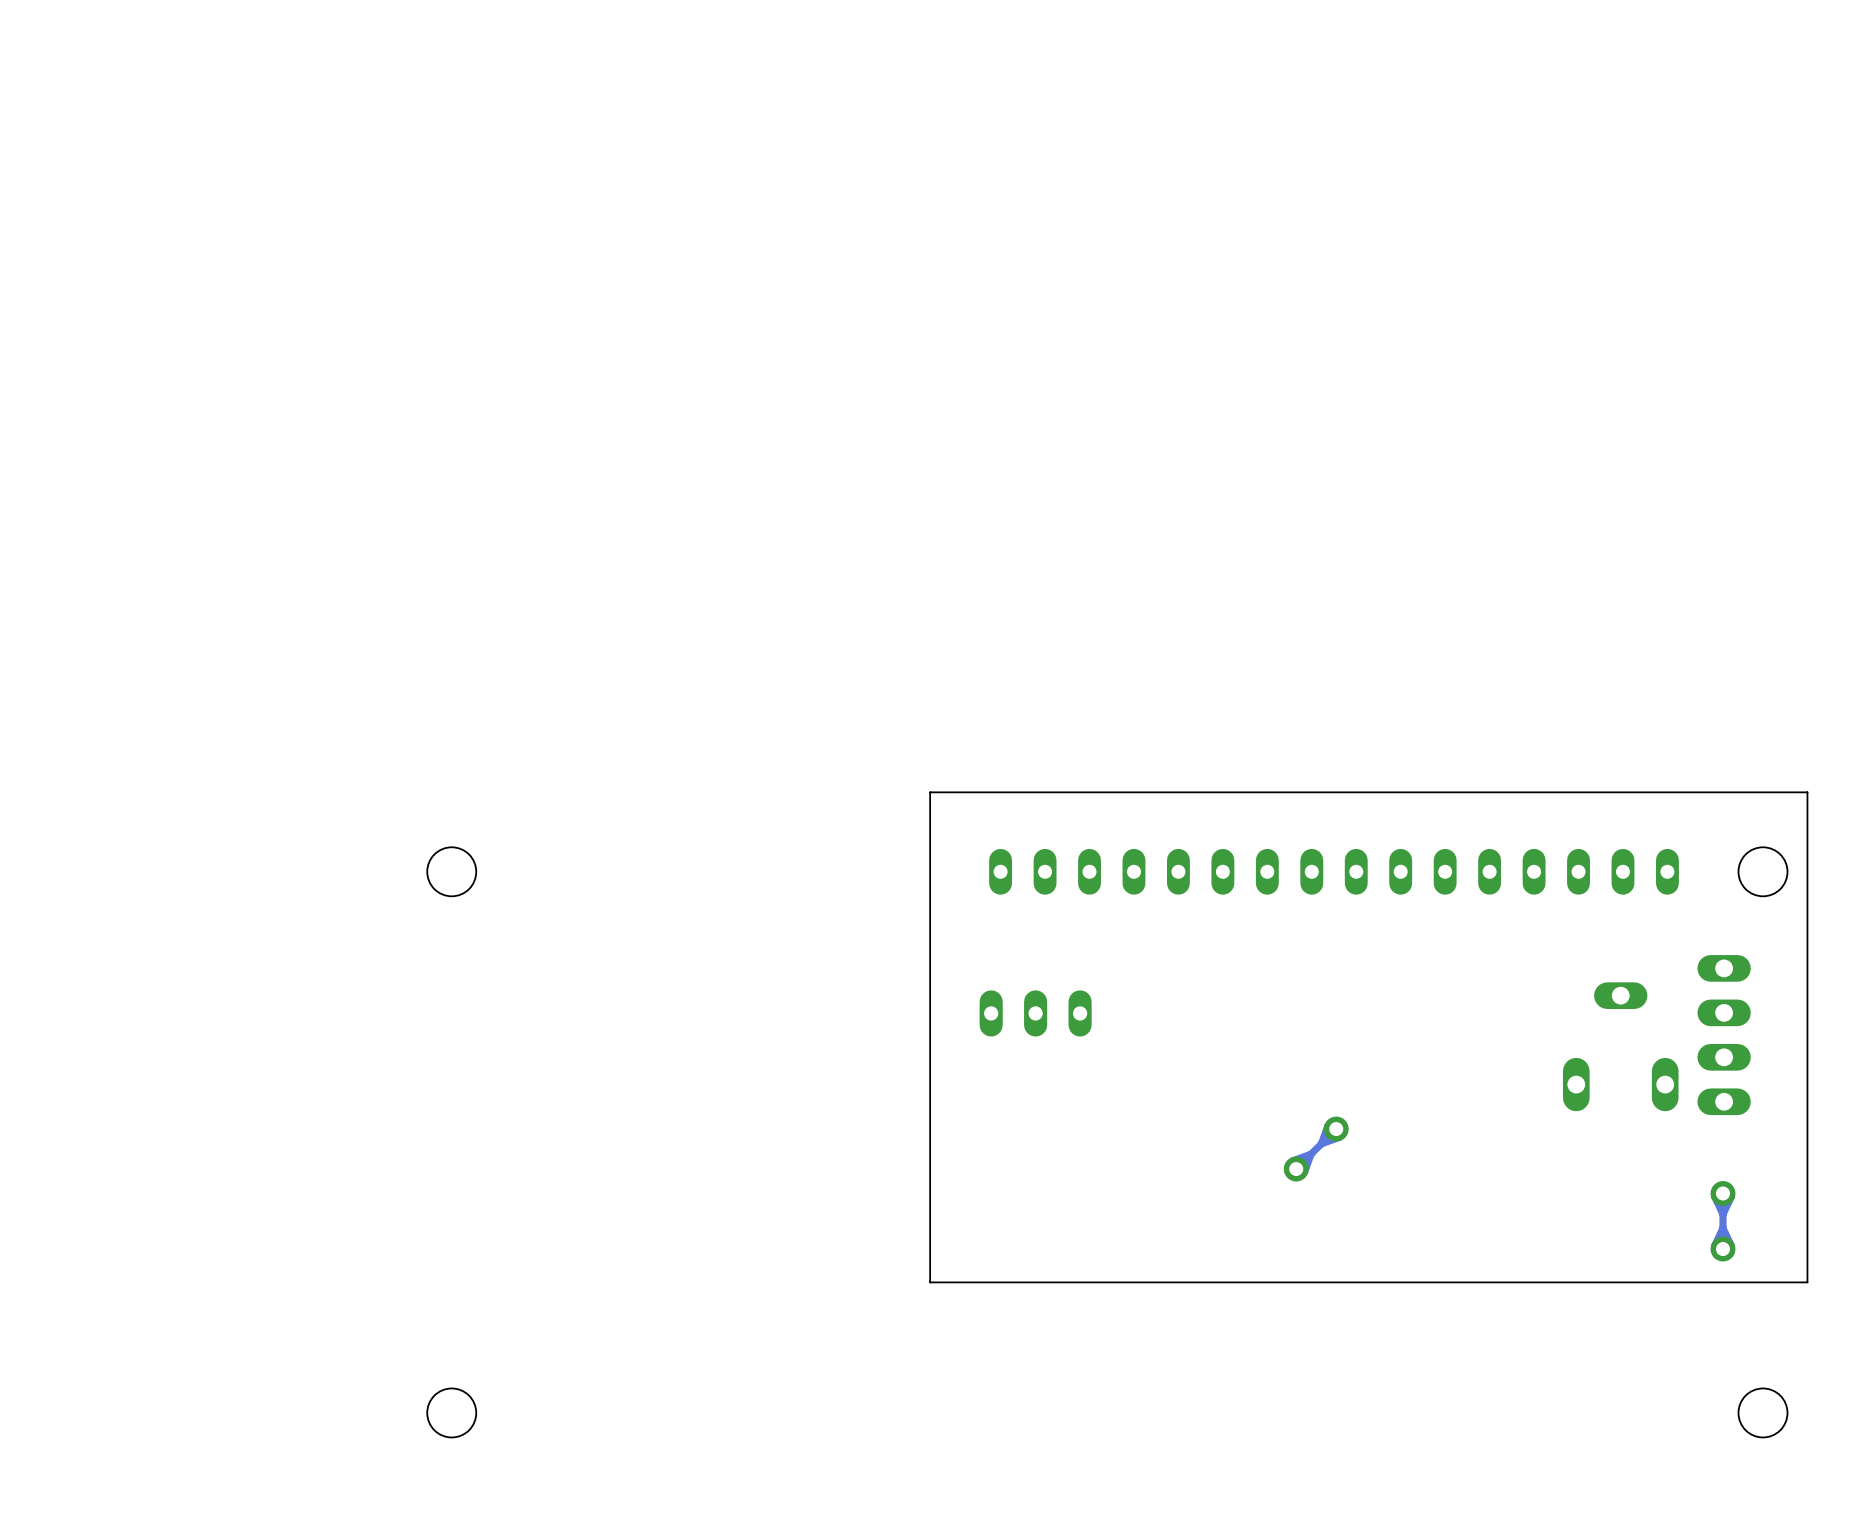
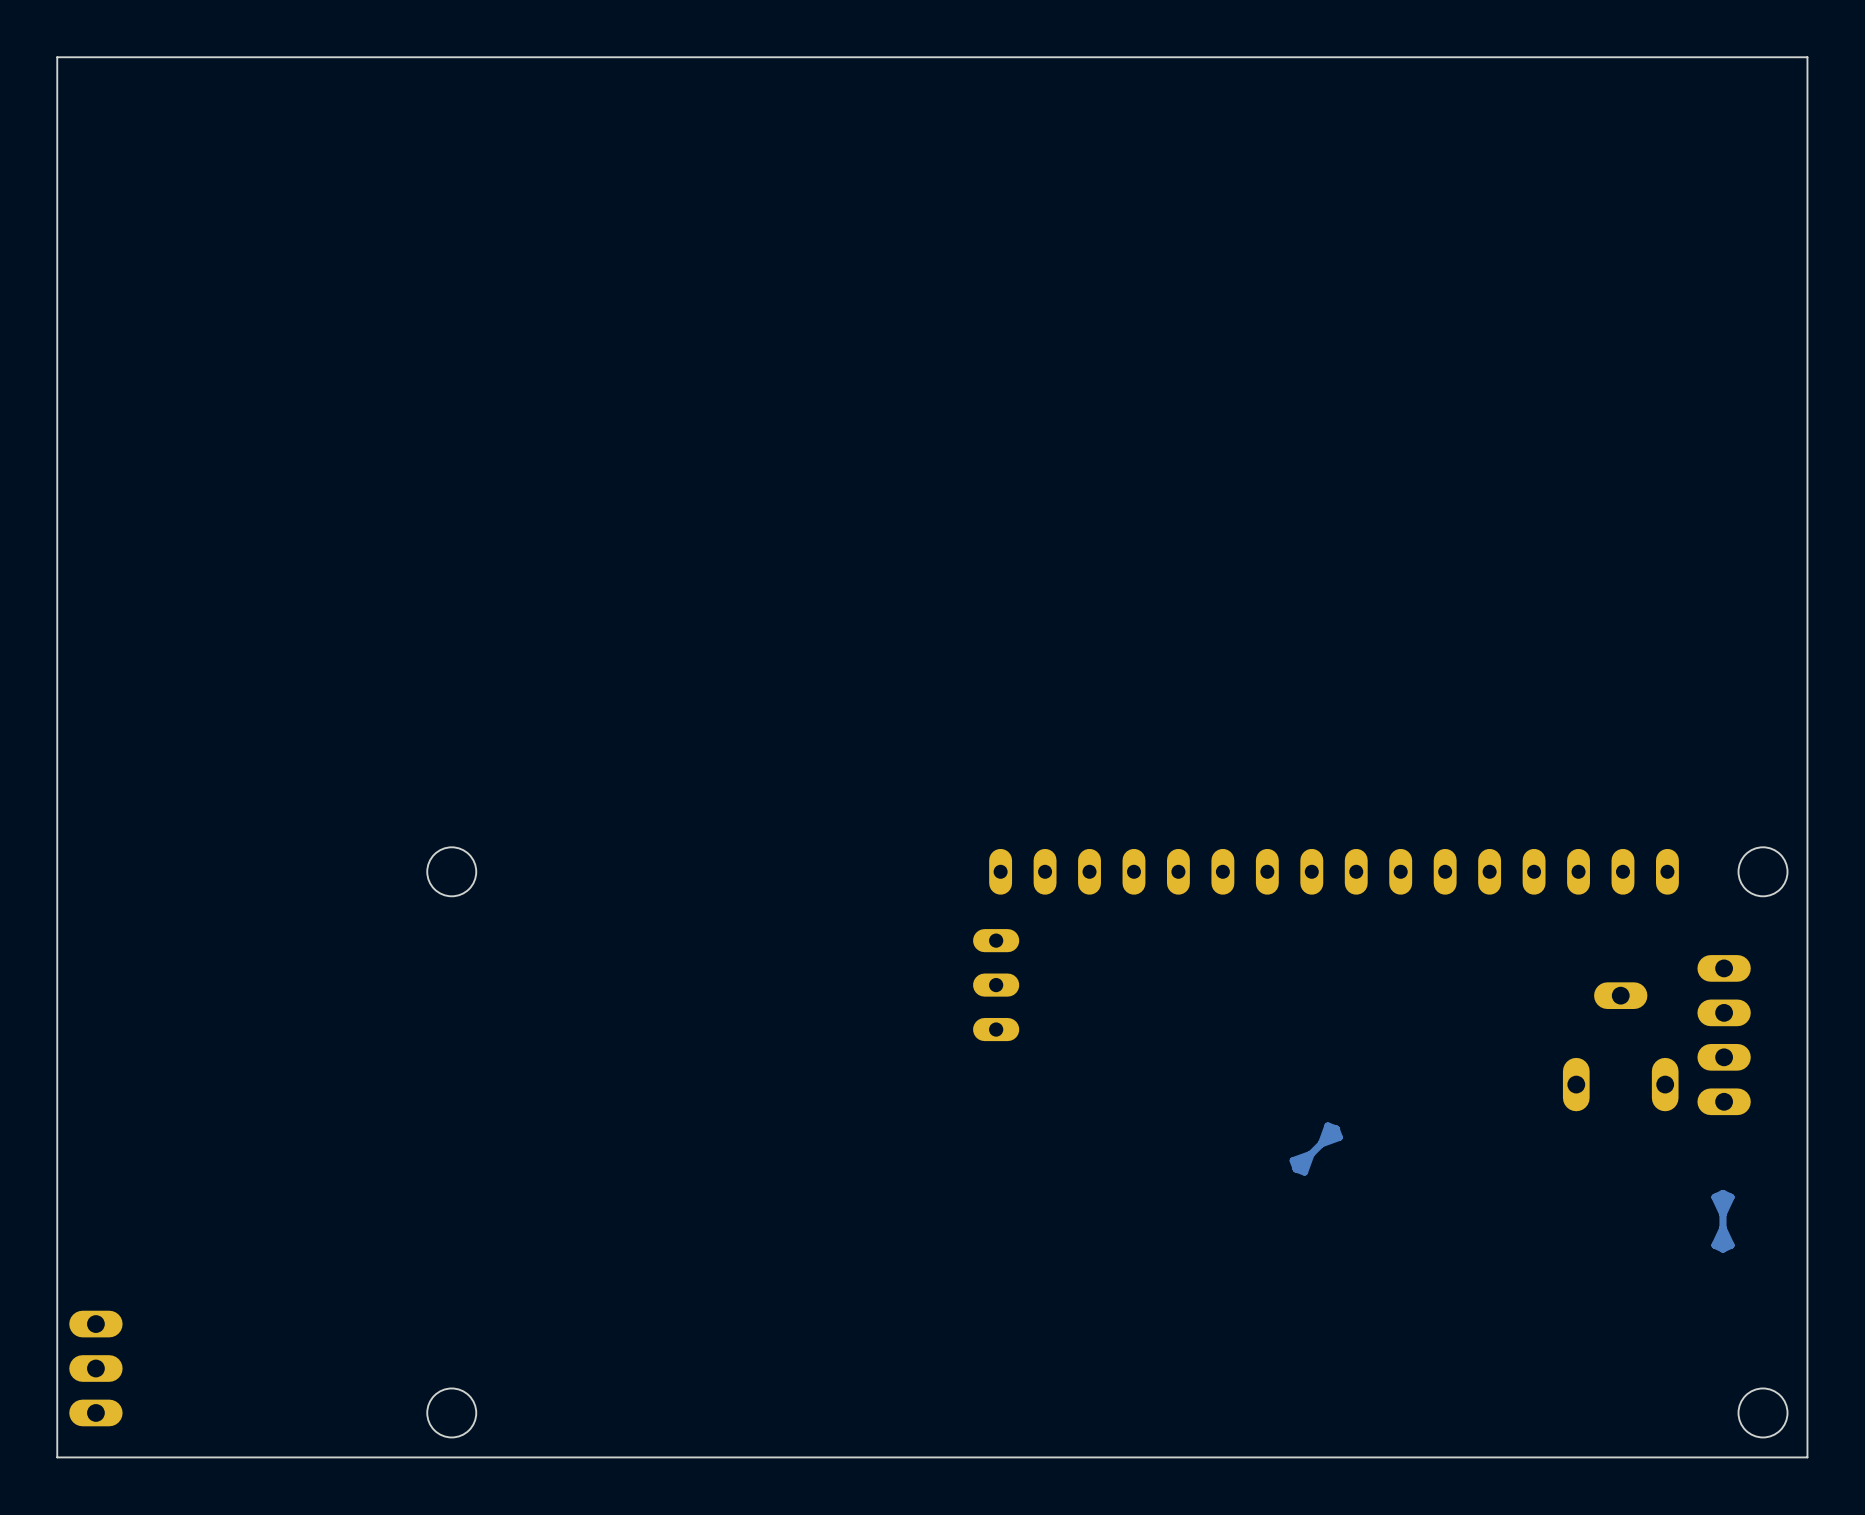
board edge: (1807, 792) (930, 792) (930, 1282) (1807, 1282) -> (1807, 792) (1807, 57) (57, 57) (57, 1457) (1807, 1457) (1807, 1282)
part rotation: 0° (1035, 1013) -> 90° clockwise (996, 985)
via: (1336, 1129) -> none
via: (1296, 1169) -> none
via: (1722, 1193) -> none
via: (1722, 1249) -> none
part: none -> (95, 1368)

